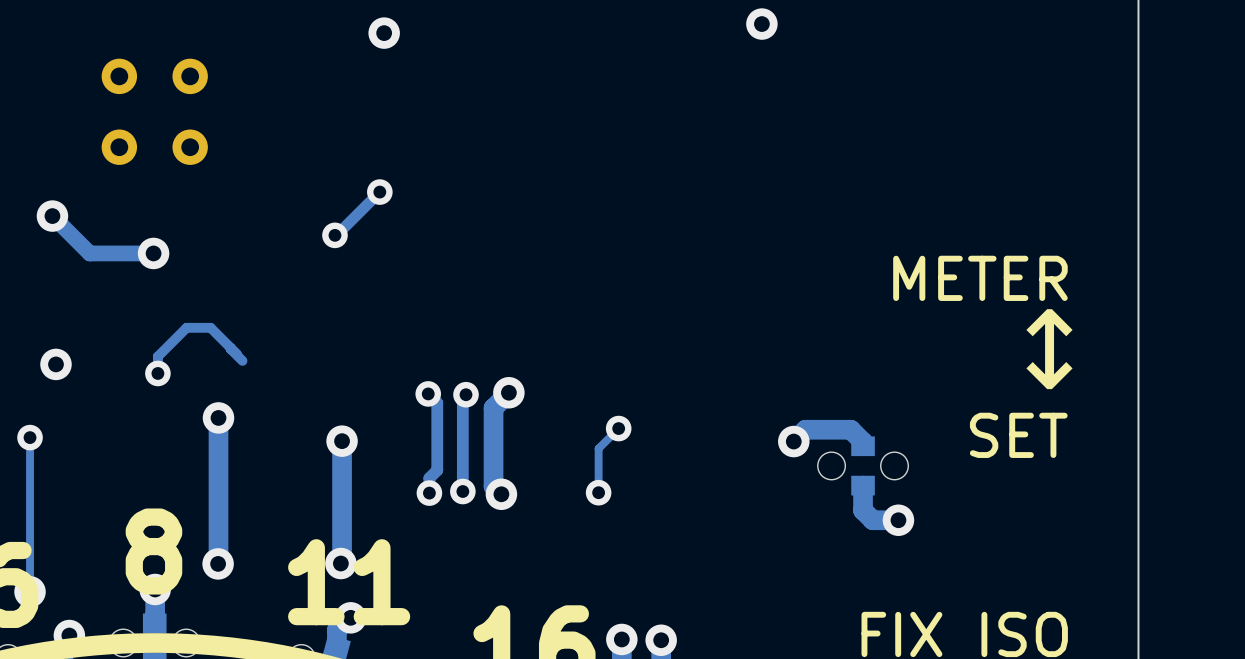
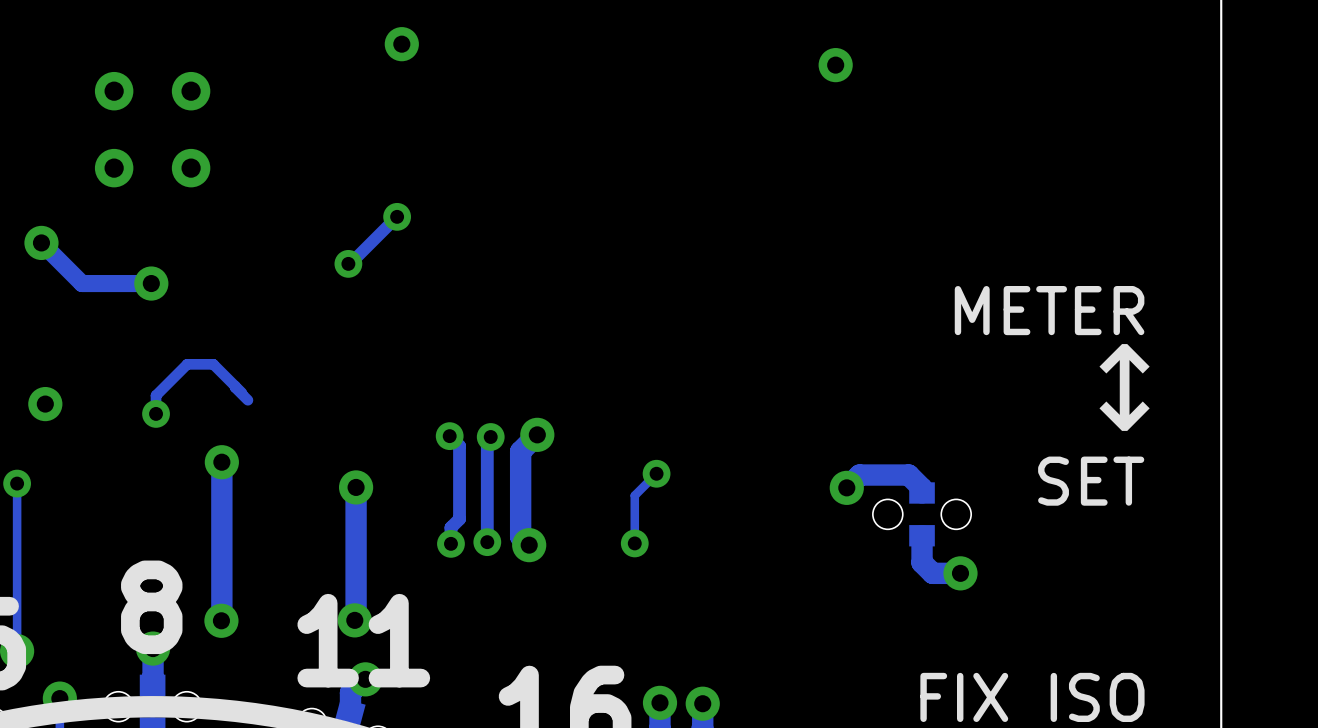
via position: (761, 24) -> (835, 65)

